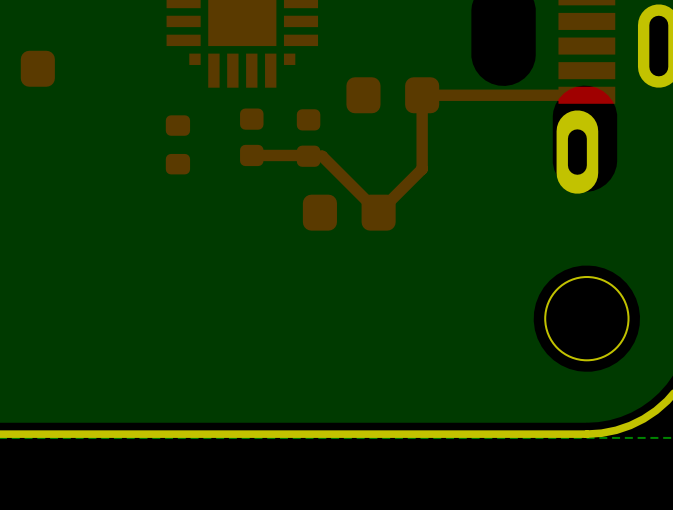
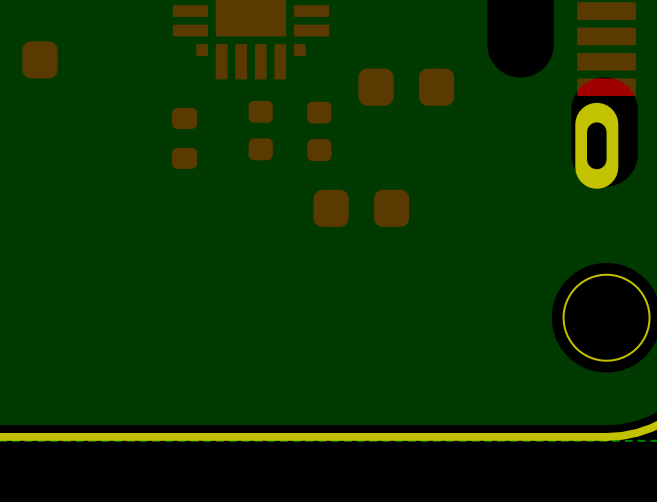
top track: (586, 95) (422, 95) (422, 169) (378, 212) (322, 156) (251, 155) -> none

